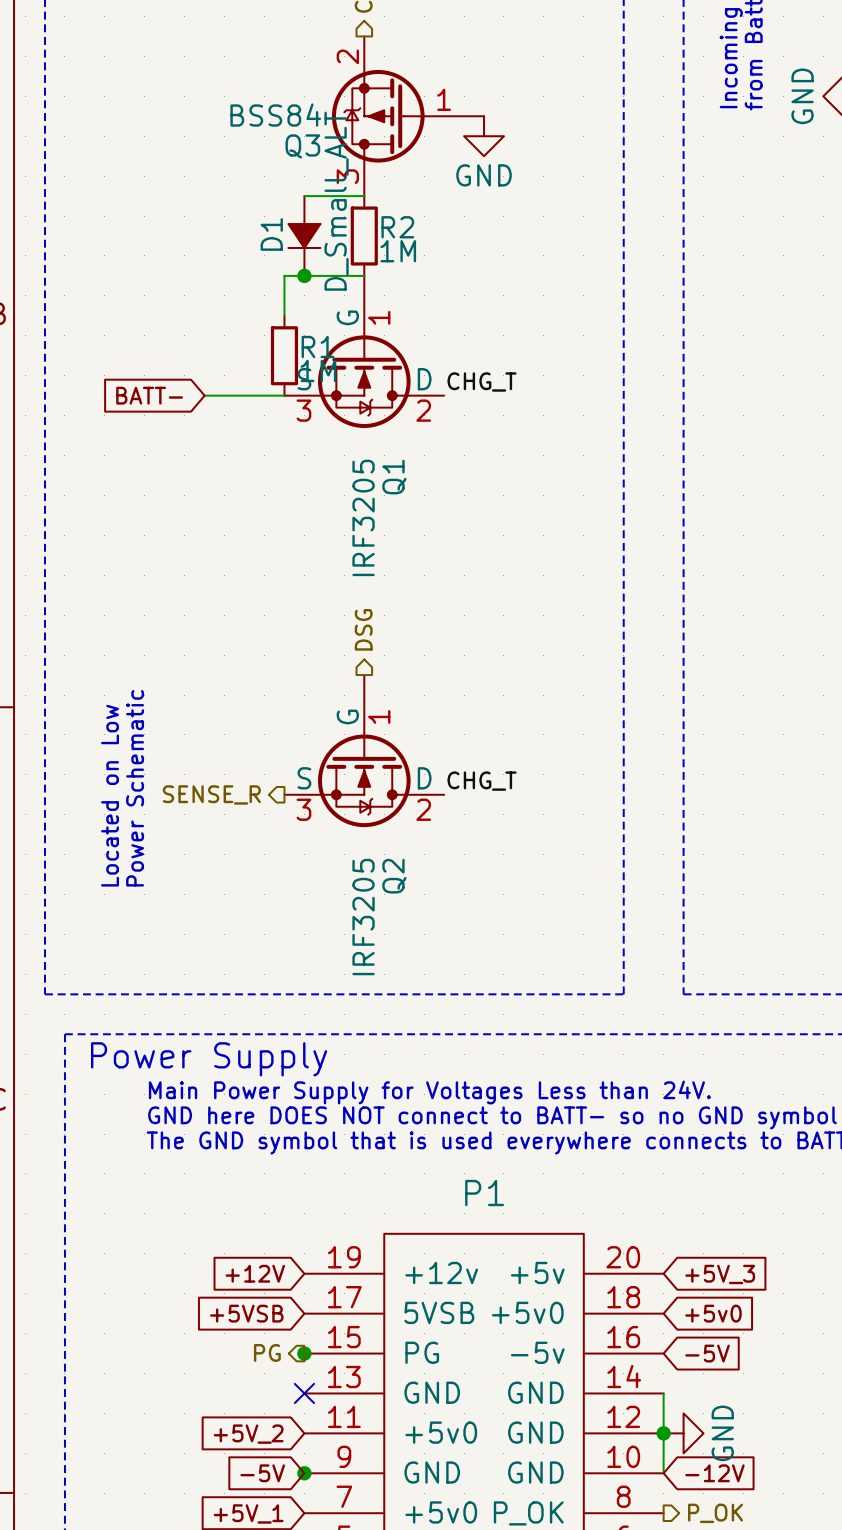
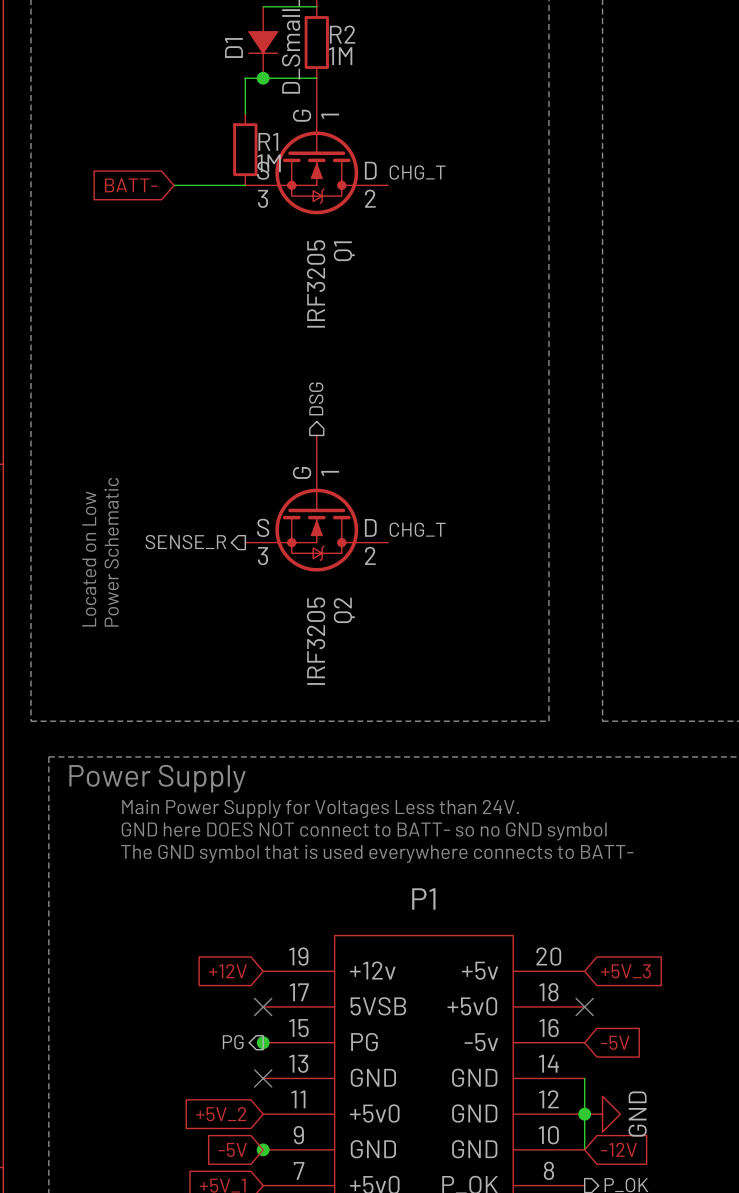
global label: +5VSB (246, 1313) -> none
no-connect mark: none -> (263, 1007)
no-connect mark: none -> (584, 1007)
global label: +5v0 (713, 1313) -> none

